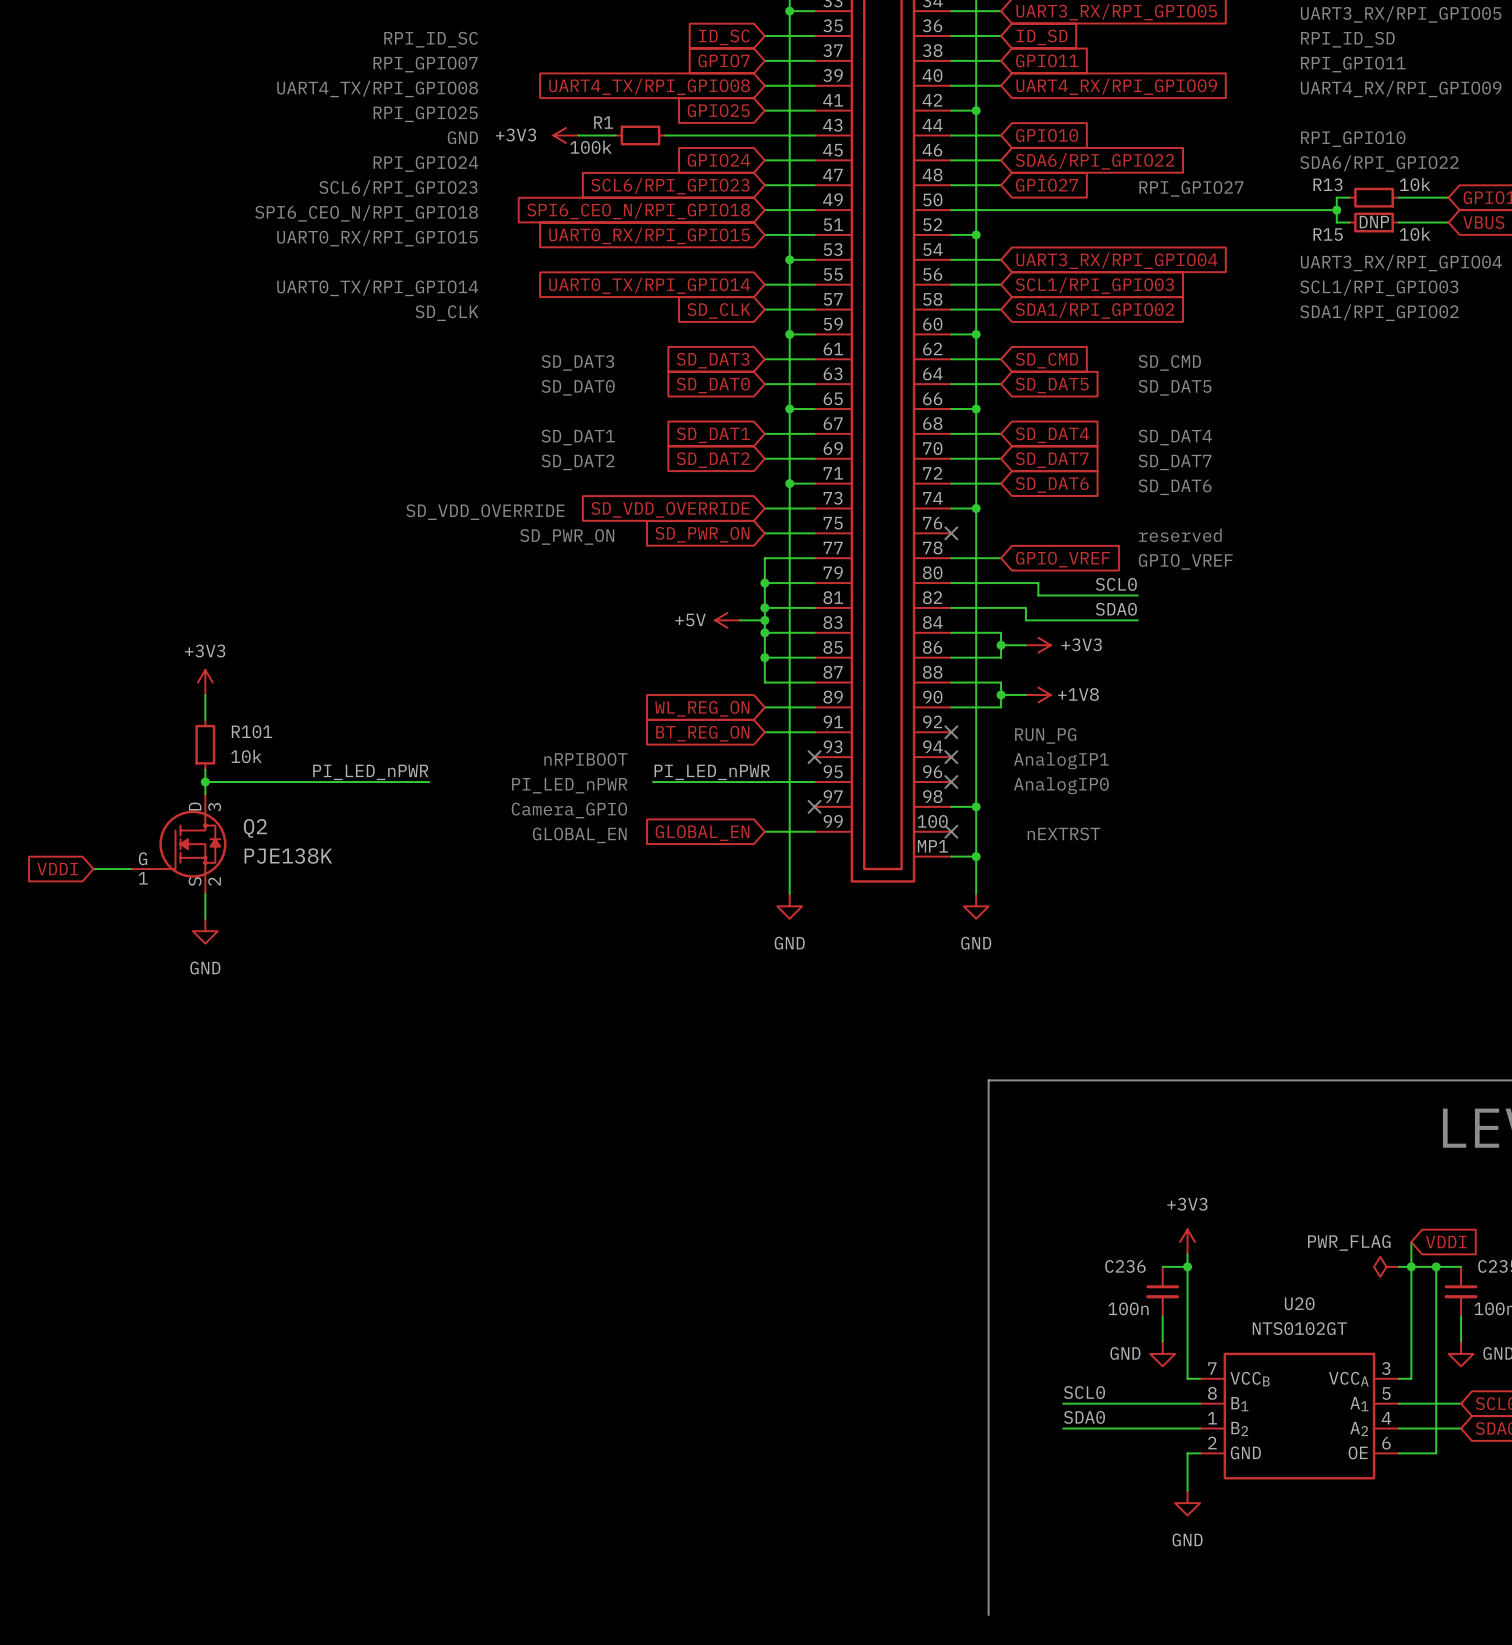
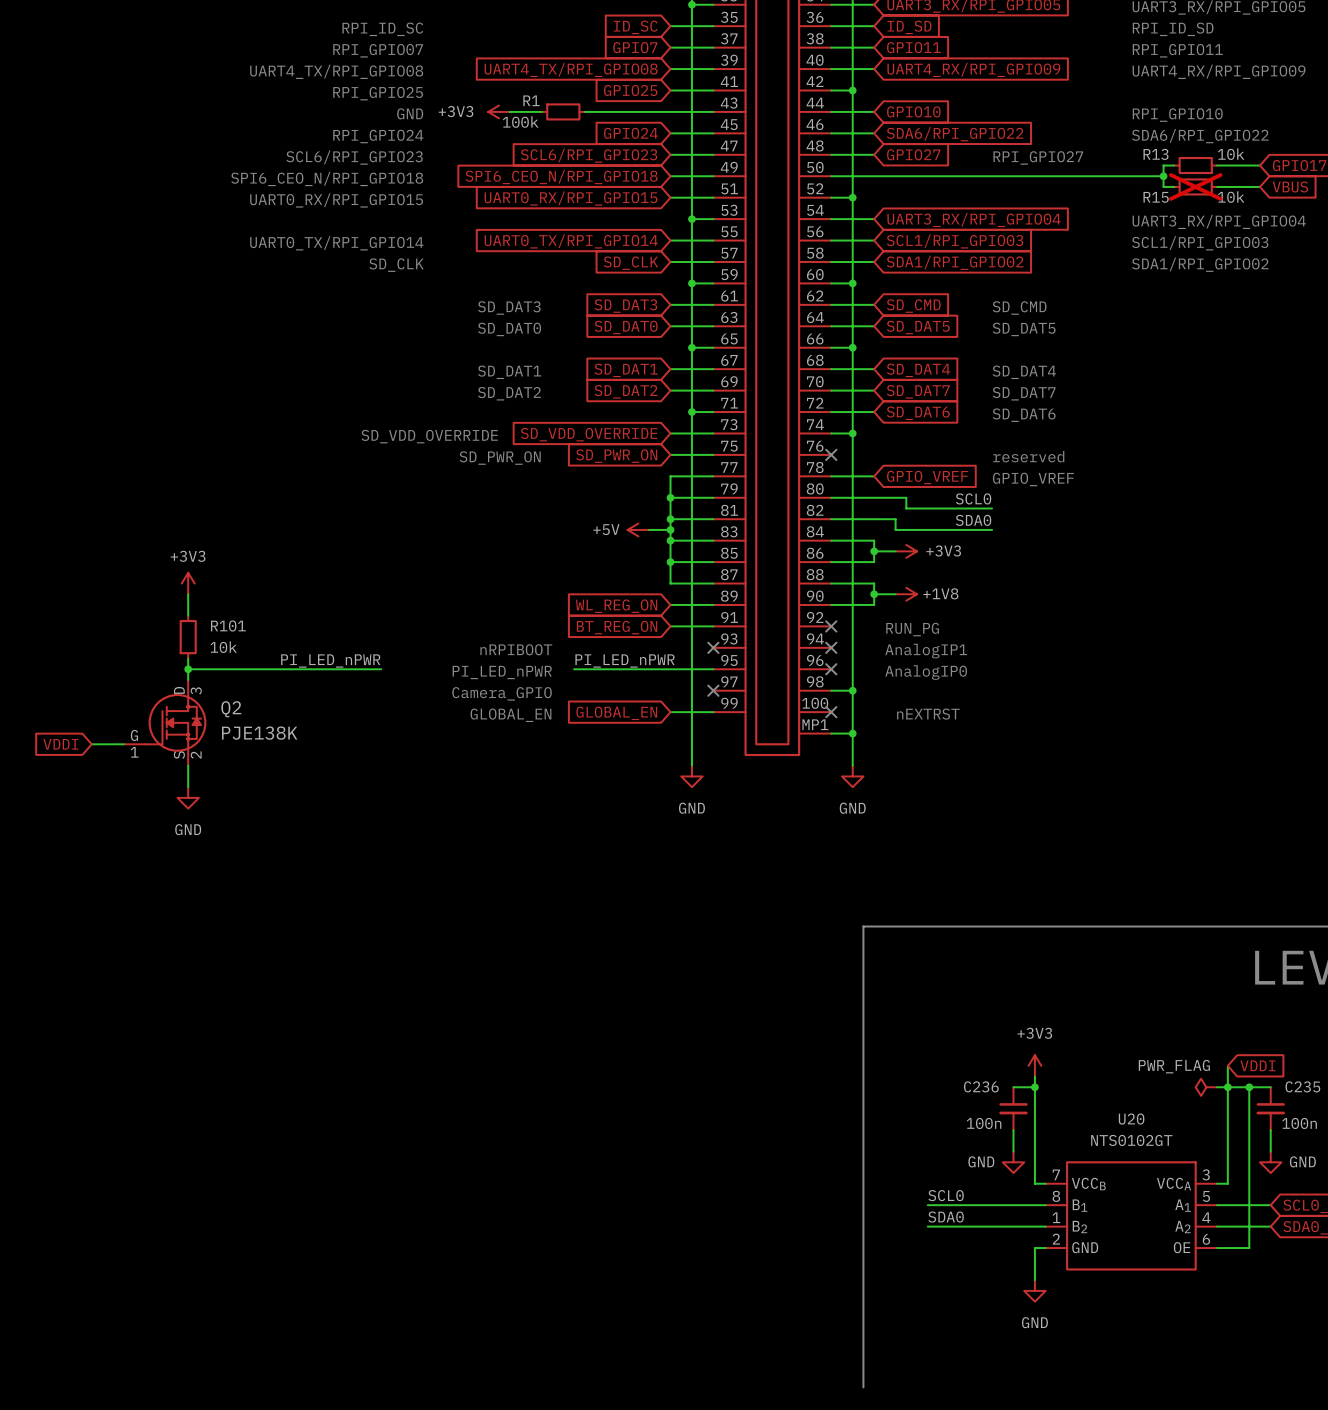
R15 do-not-place cross: none -> (1195, 186)
R15 text: DNP (1374, 222) -> none

